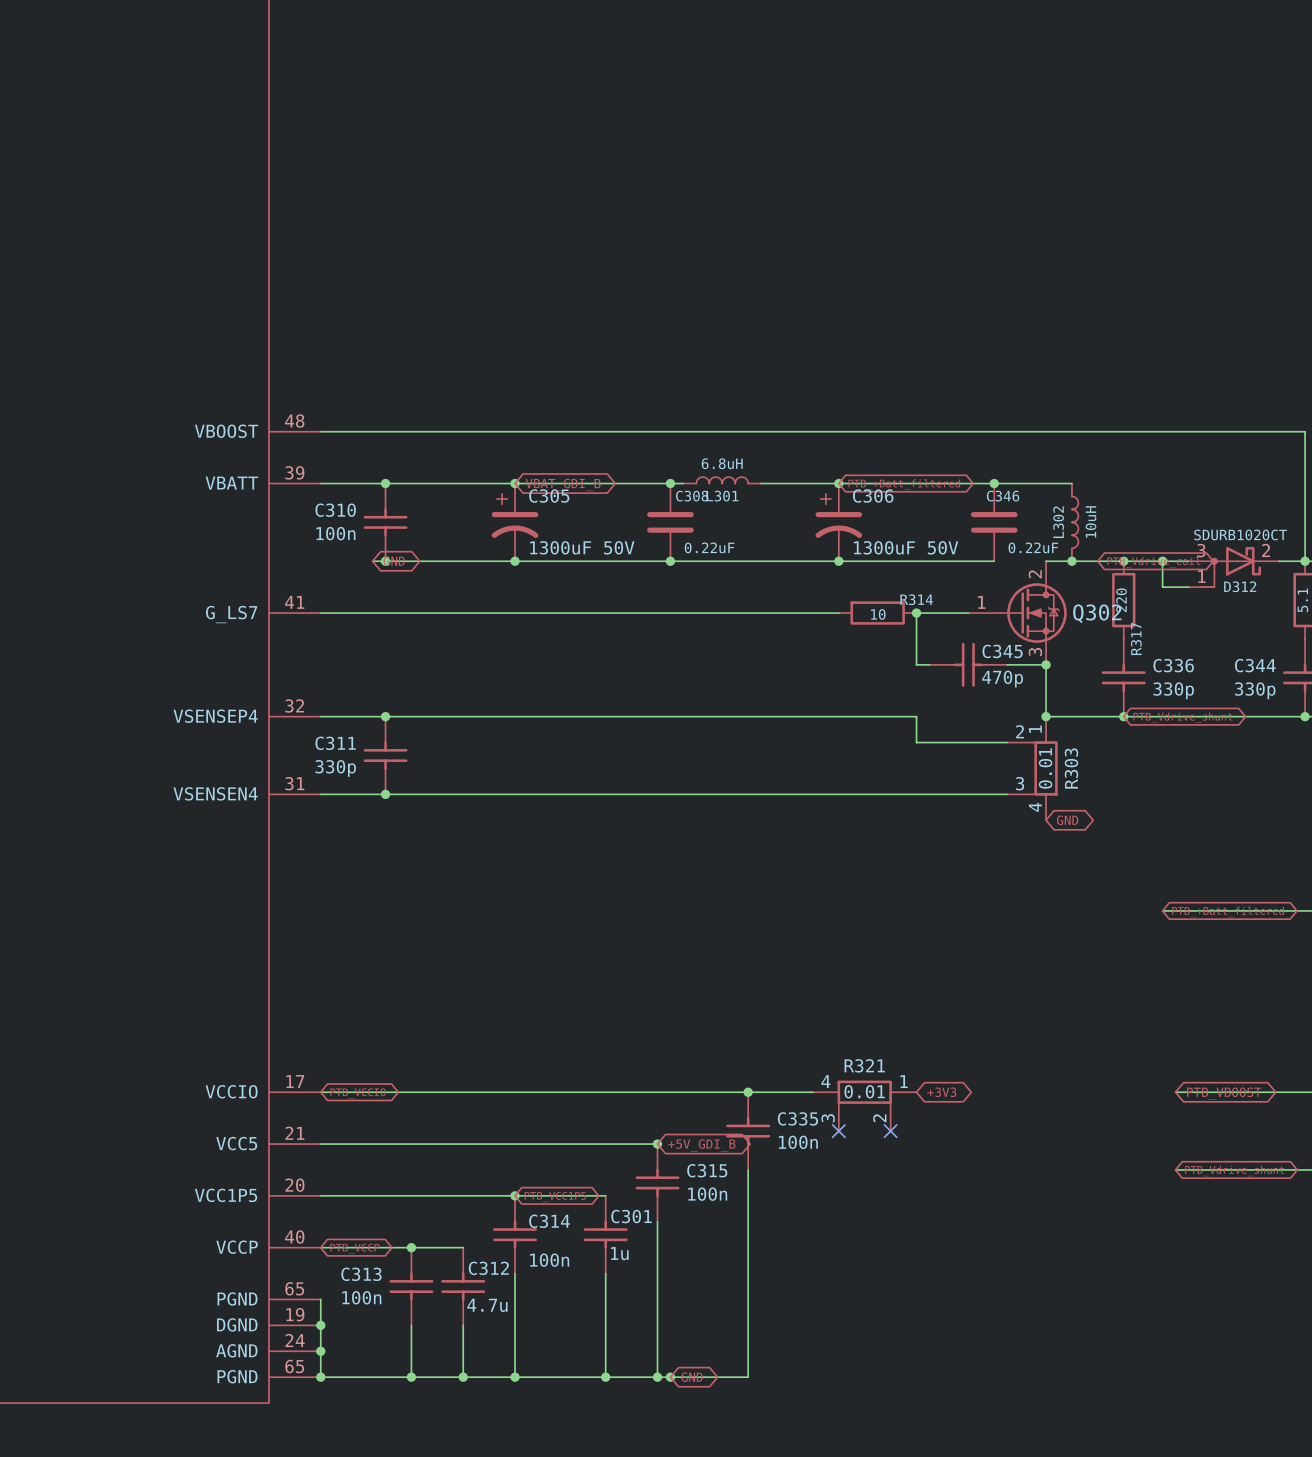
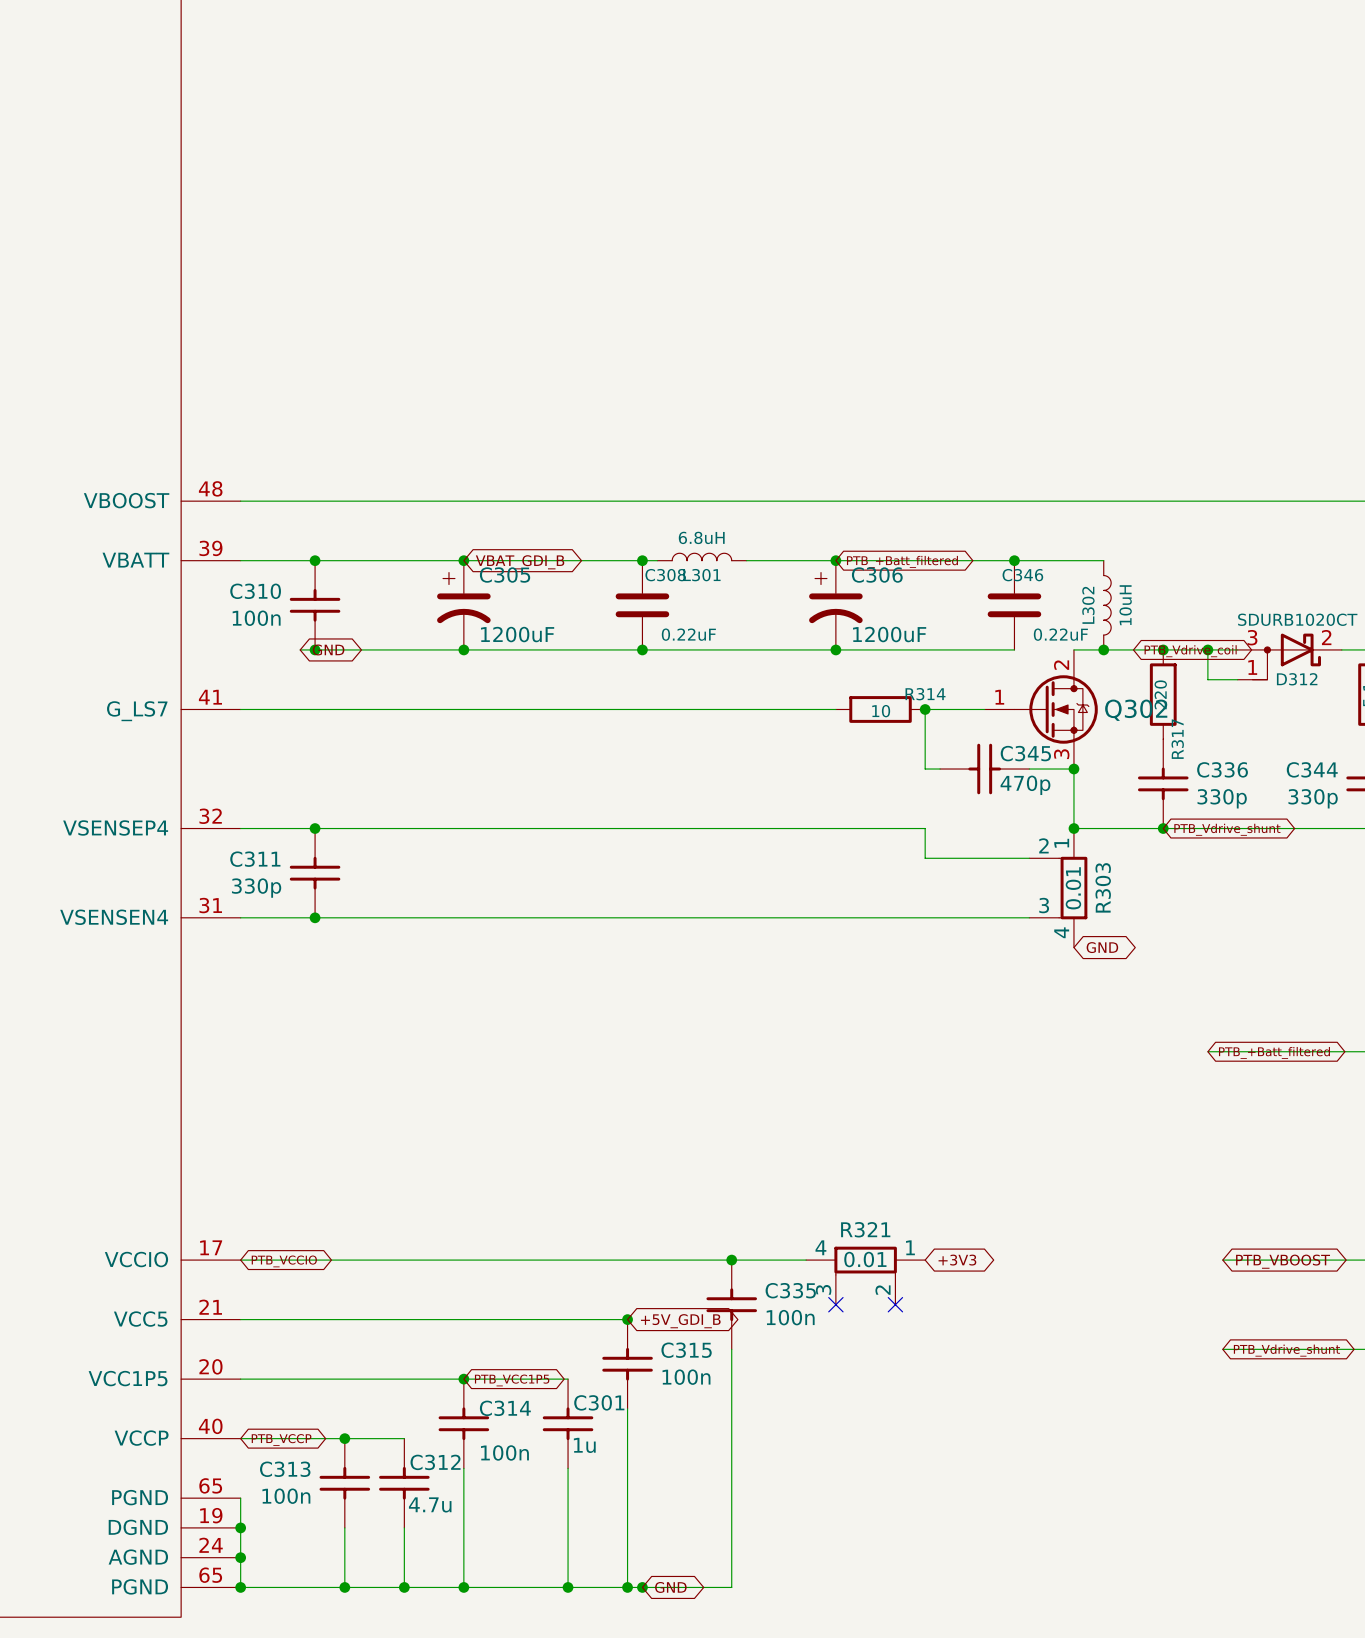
C305 value: 1300uF 50V (582, 547) -> 1200uF (517, 634)
C306 value: 1300uF 50V (906, 547) -> 1200uF (889, 634)

